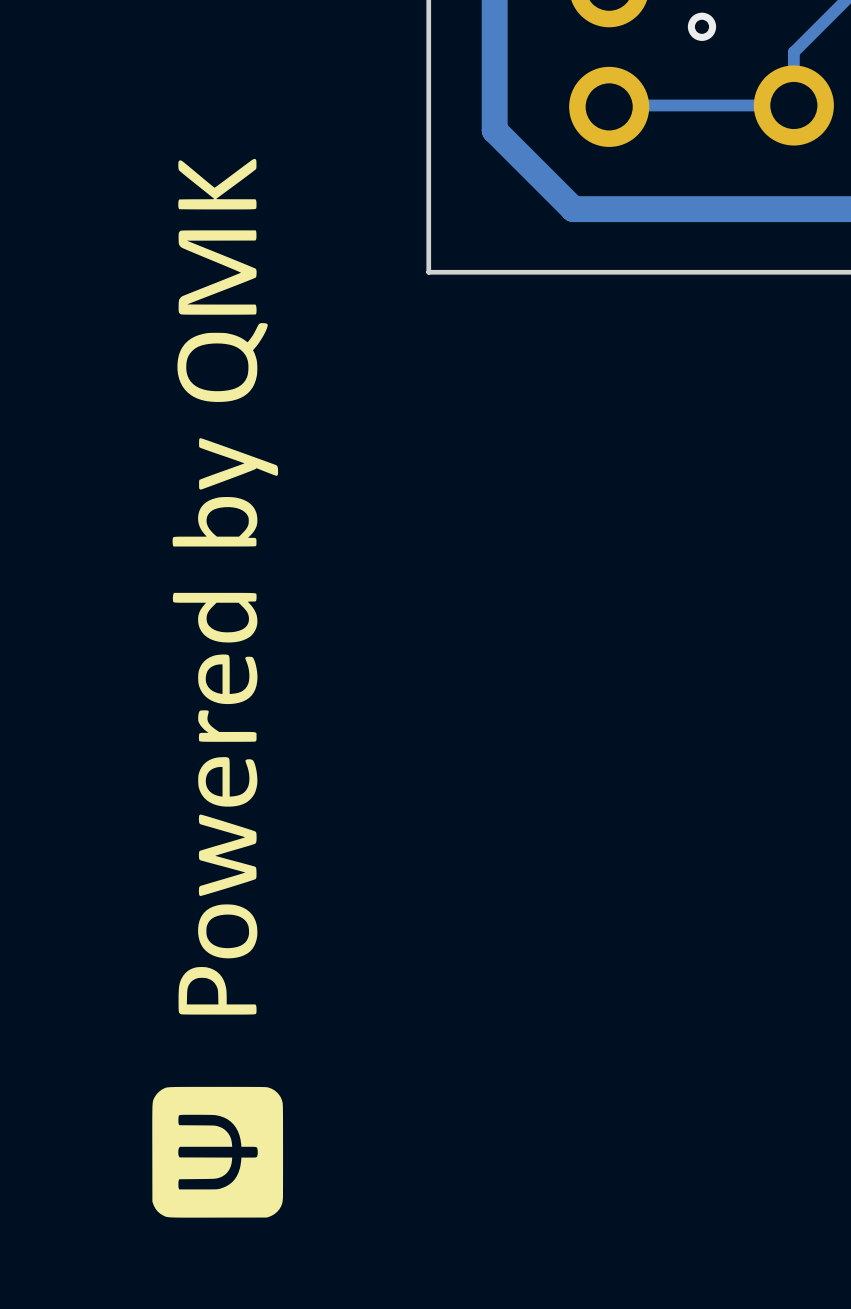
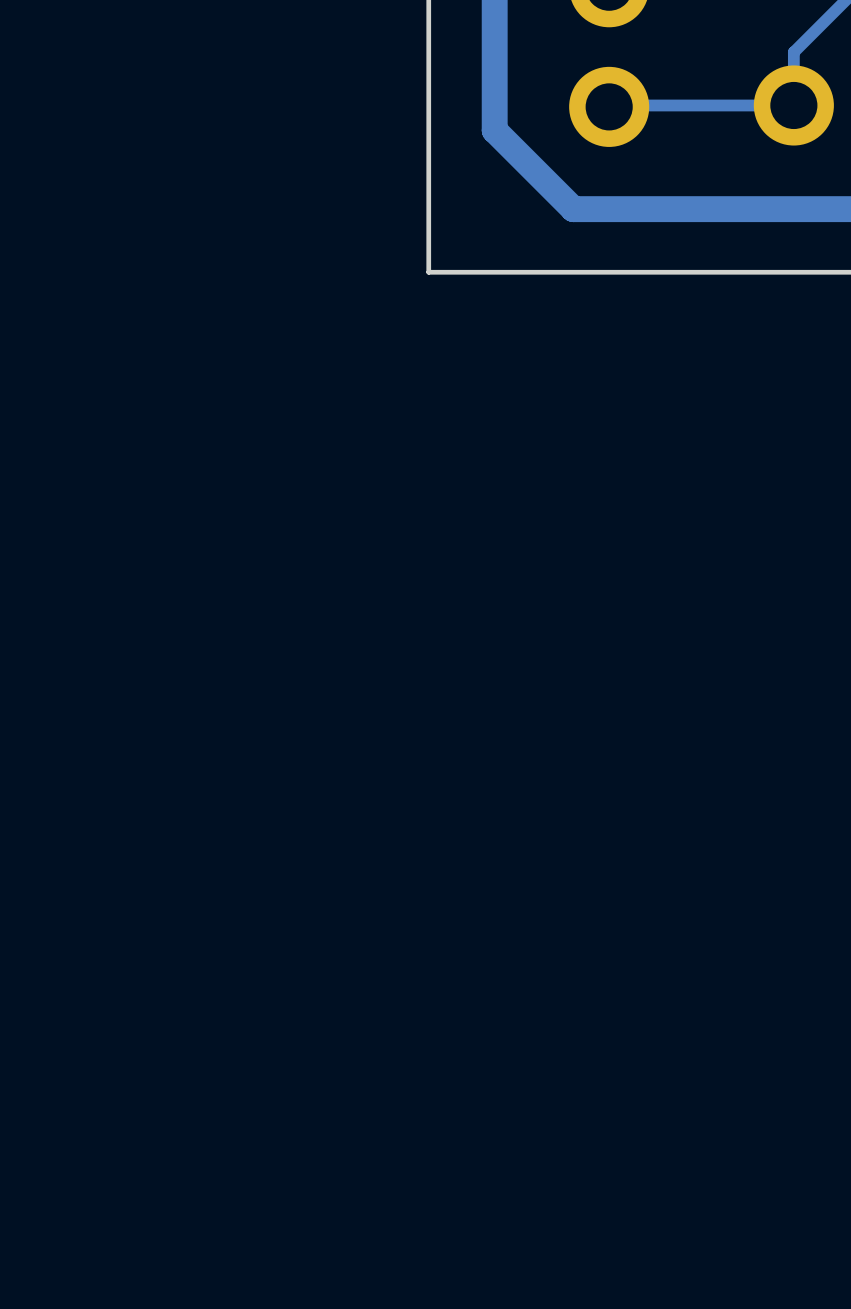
via: (701, 26) -> none
drawing: [152, 158, 284, 1218] -> none

